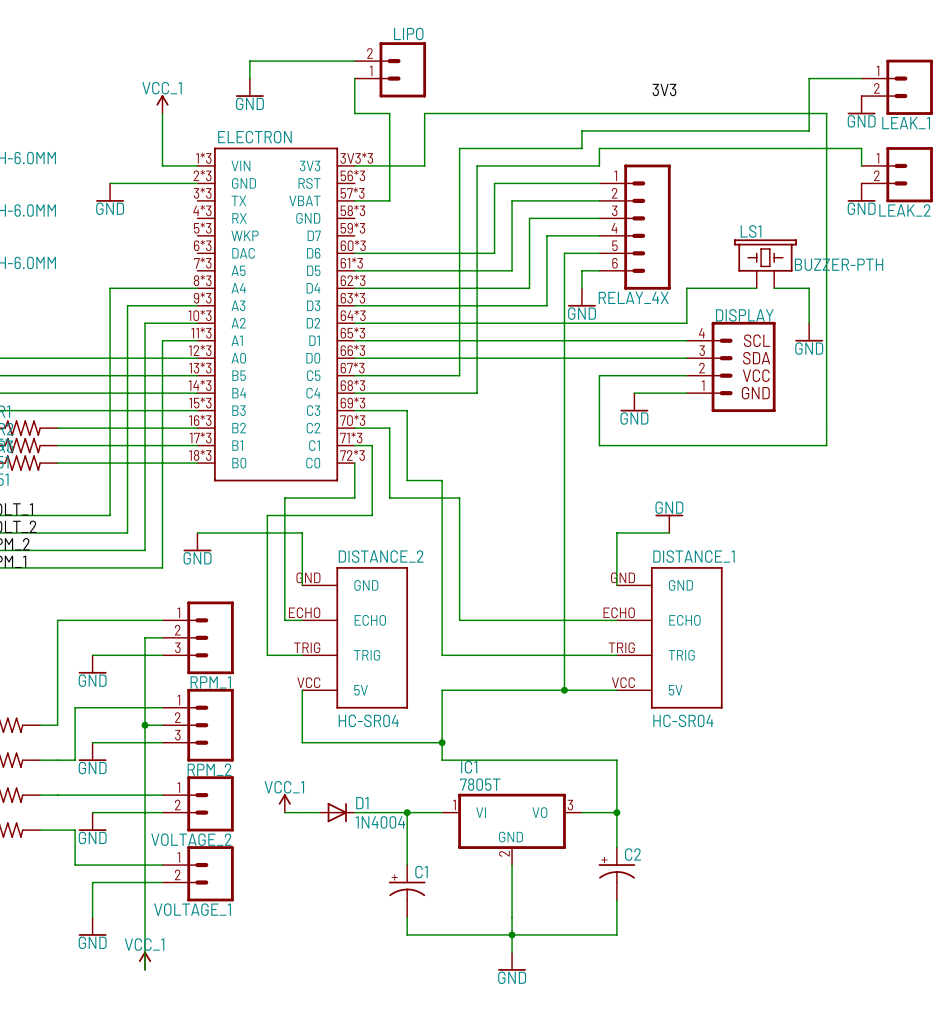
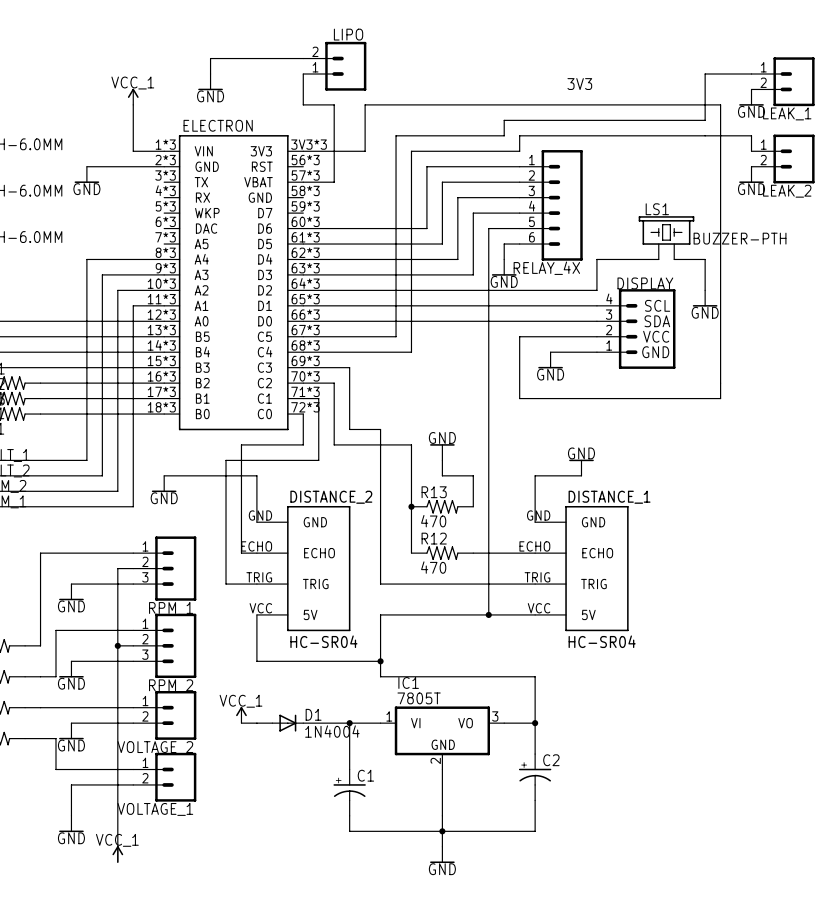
wire: (459, 498) (459, 620) (546, 620) -> (396, 444) (411, 444) (411, 553)
power symbol: none -> GND (442, 452)
wire: none -> (442, 460) (442, 475) (473, 475) (473, 506)
junction: none -> (411, 506)
R13: none -> 470 (442, 506)
R12: none -> 470 (442, 553)

